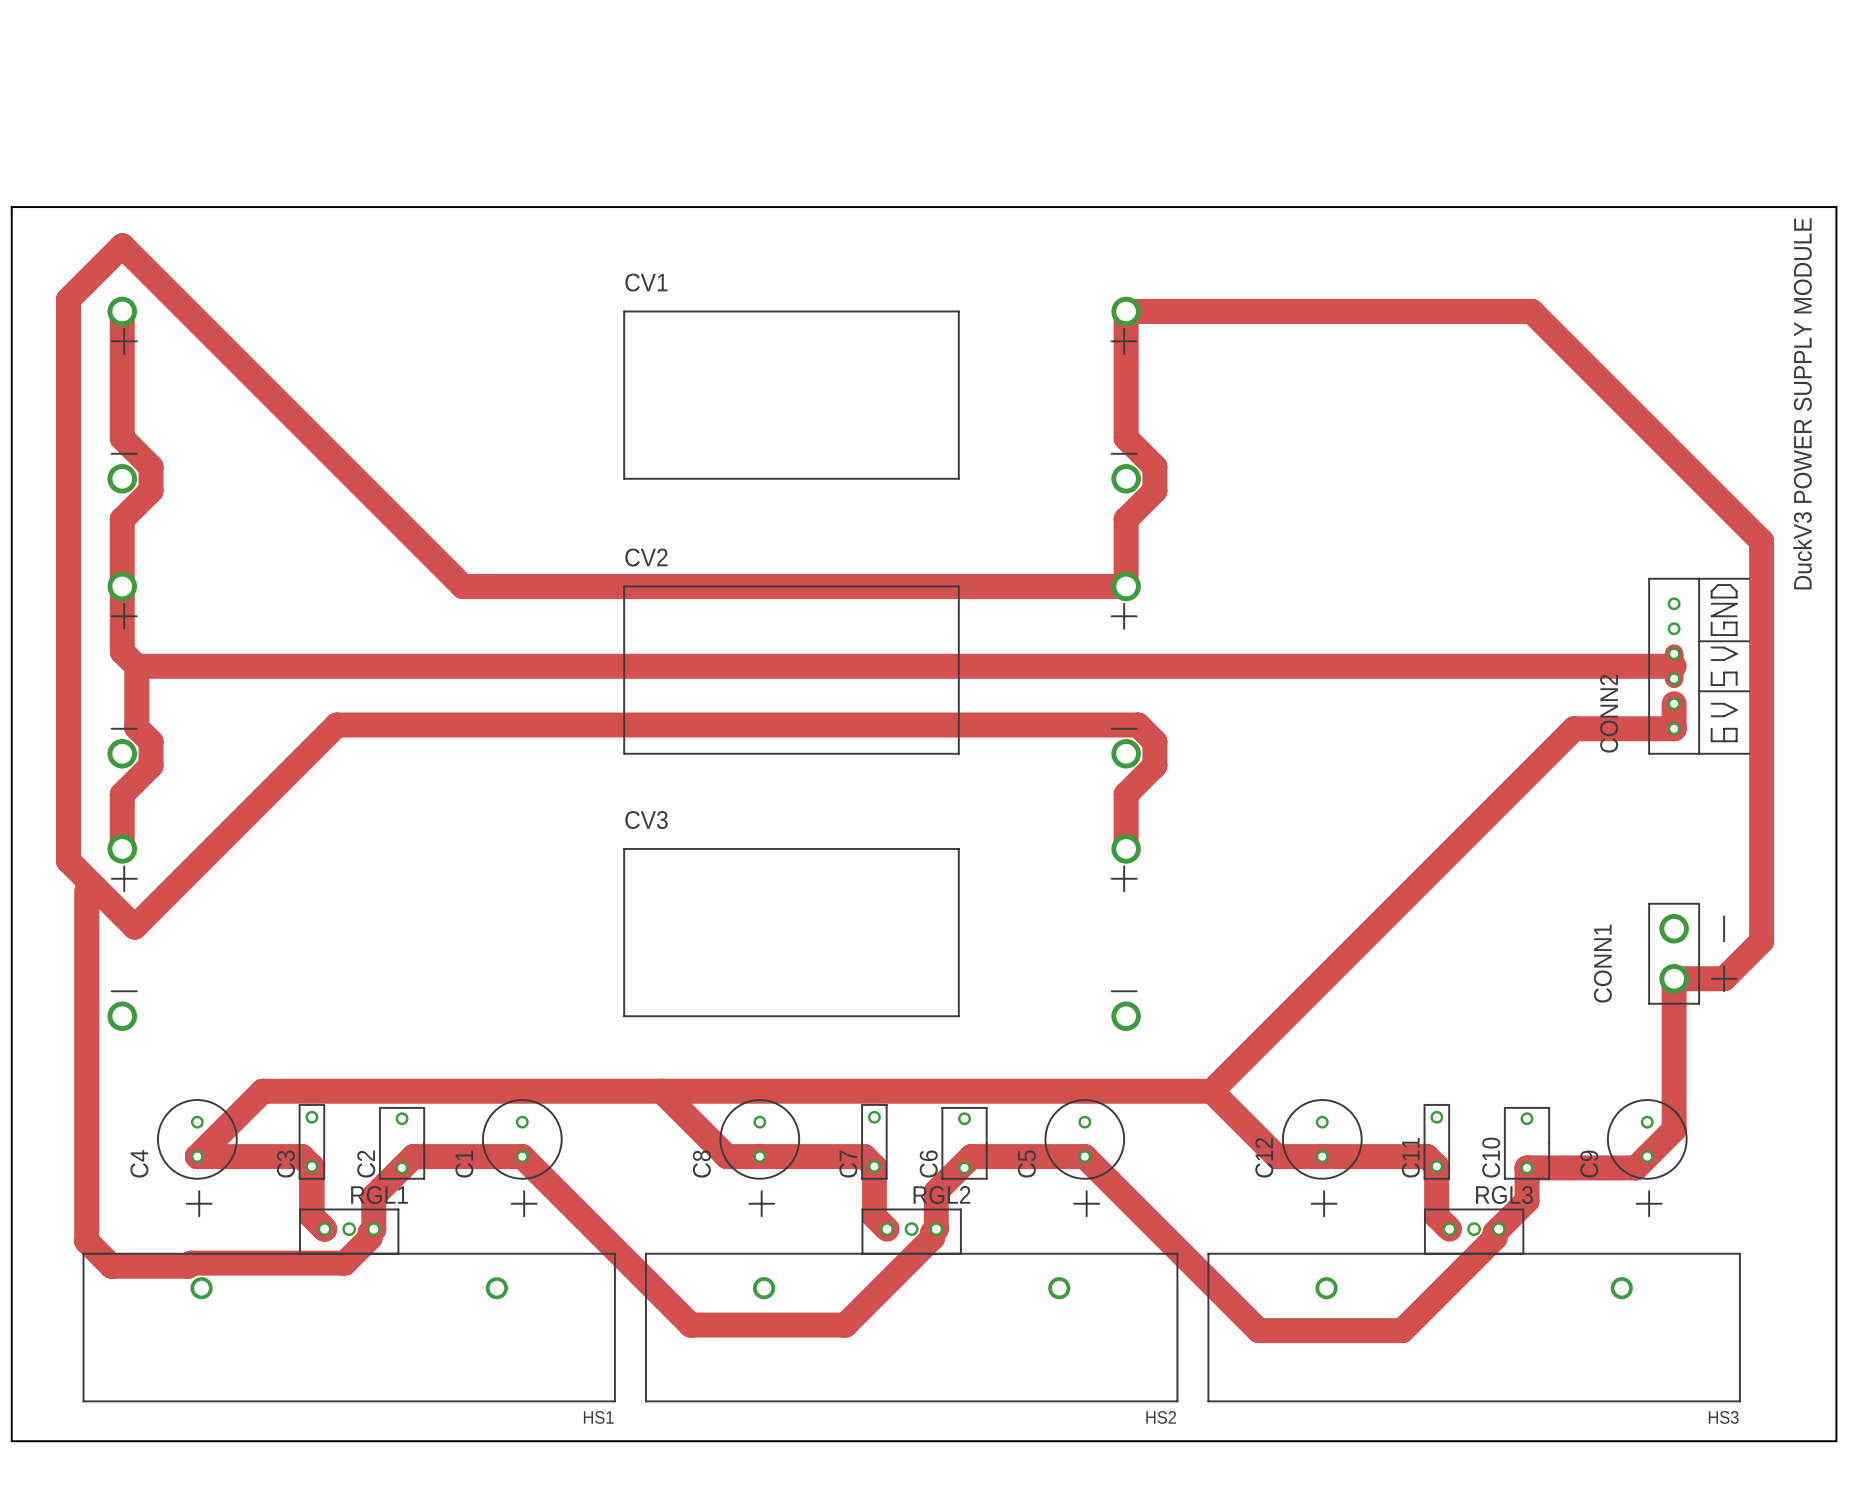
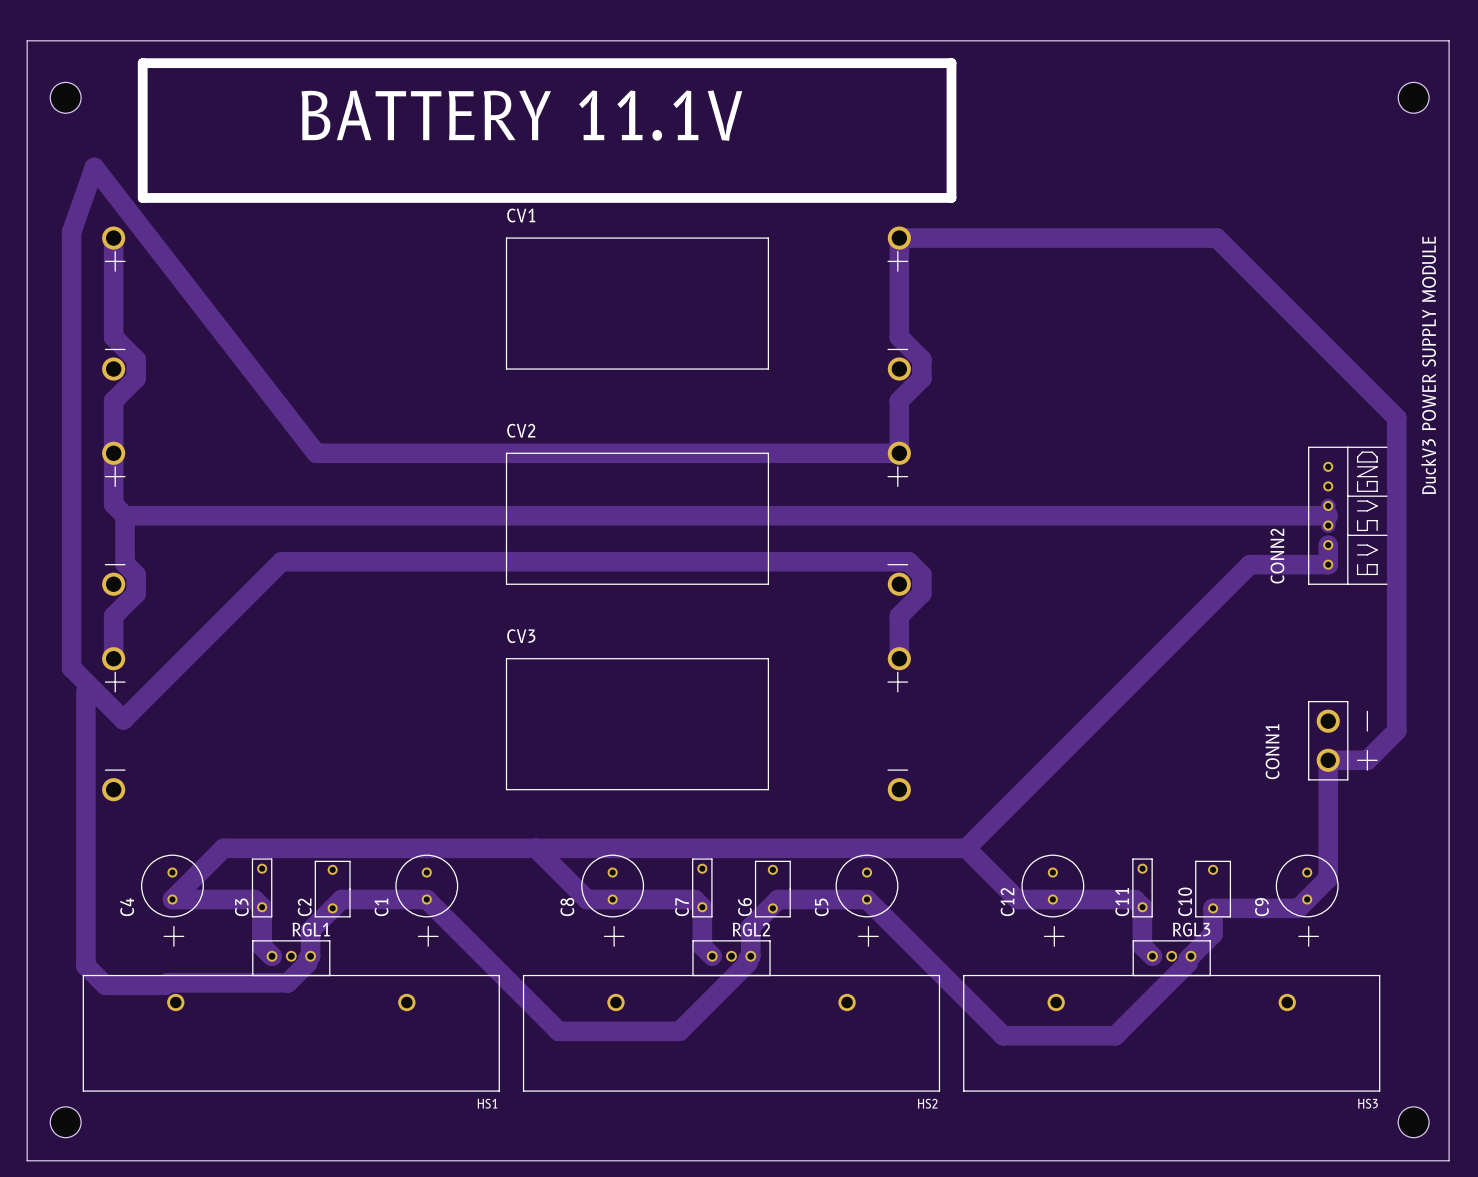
line: none -> (142, 63) (142, 197) (951, 197) (951, 63) (142, 63)
hole: none -> (65, 97)
hole: none -> (1413, 97)
text: none -> BATTERY 11.1V (521, 115)
board edge: (11, 207) (1836, 207) (1836, 1441) (11, 1441) -> (27, 156) (27, 40) (1449, 40) (1449, 1160) (27, 1160) (27, 1122)
track: (68, 303) (68, 299) (122, 245) (462, 586) -> (71, 232) (94, 167) (316, 453) (380, 453)
text position: DuckV3 POWER SUPPLY MODULE (1802, 403) -> DuckV3 POWER SUPPLY MODULE (1428, 365)
hole: none -> (65, 1122)
hole: none -> (1413, 1122)

